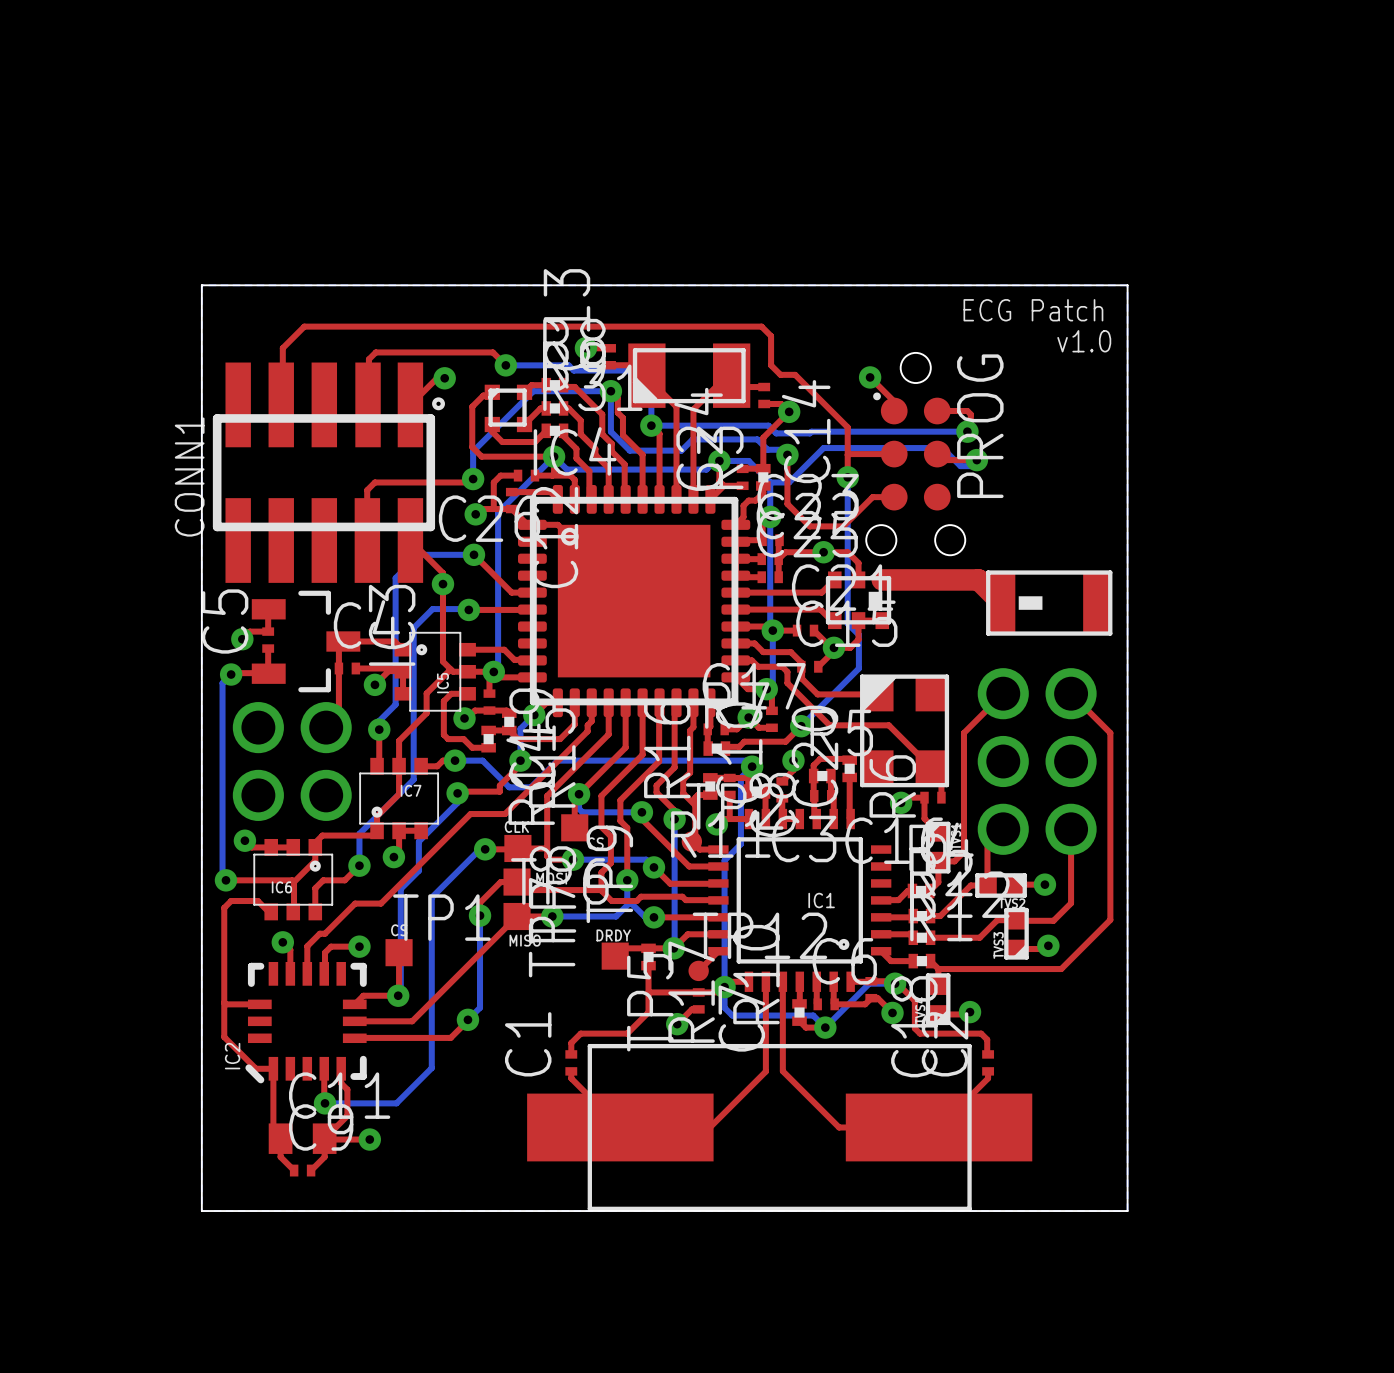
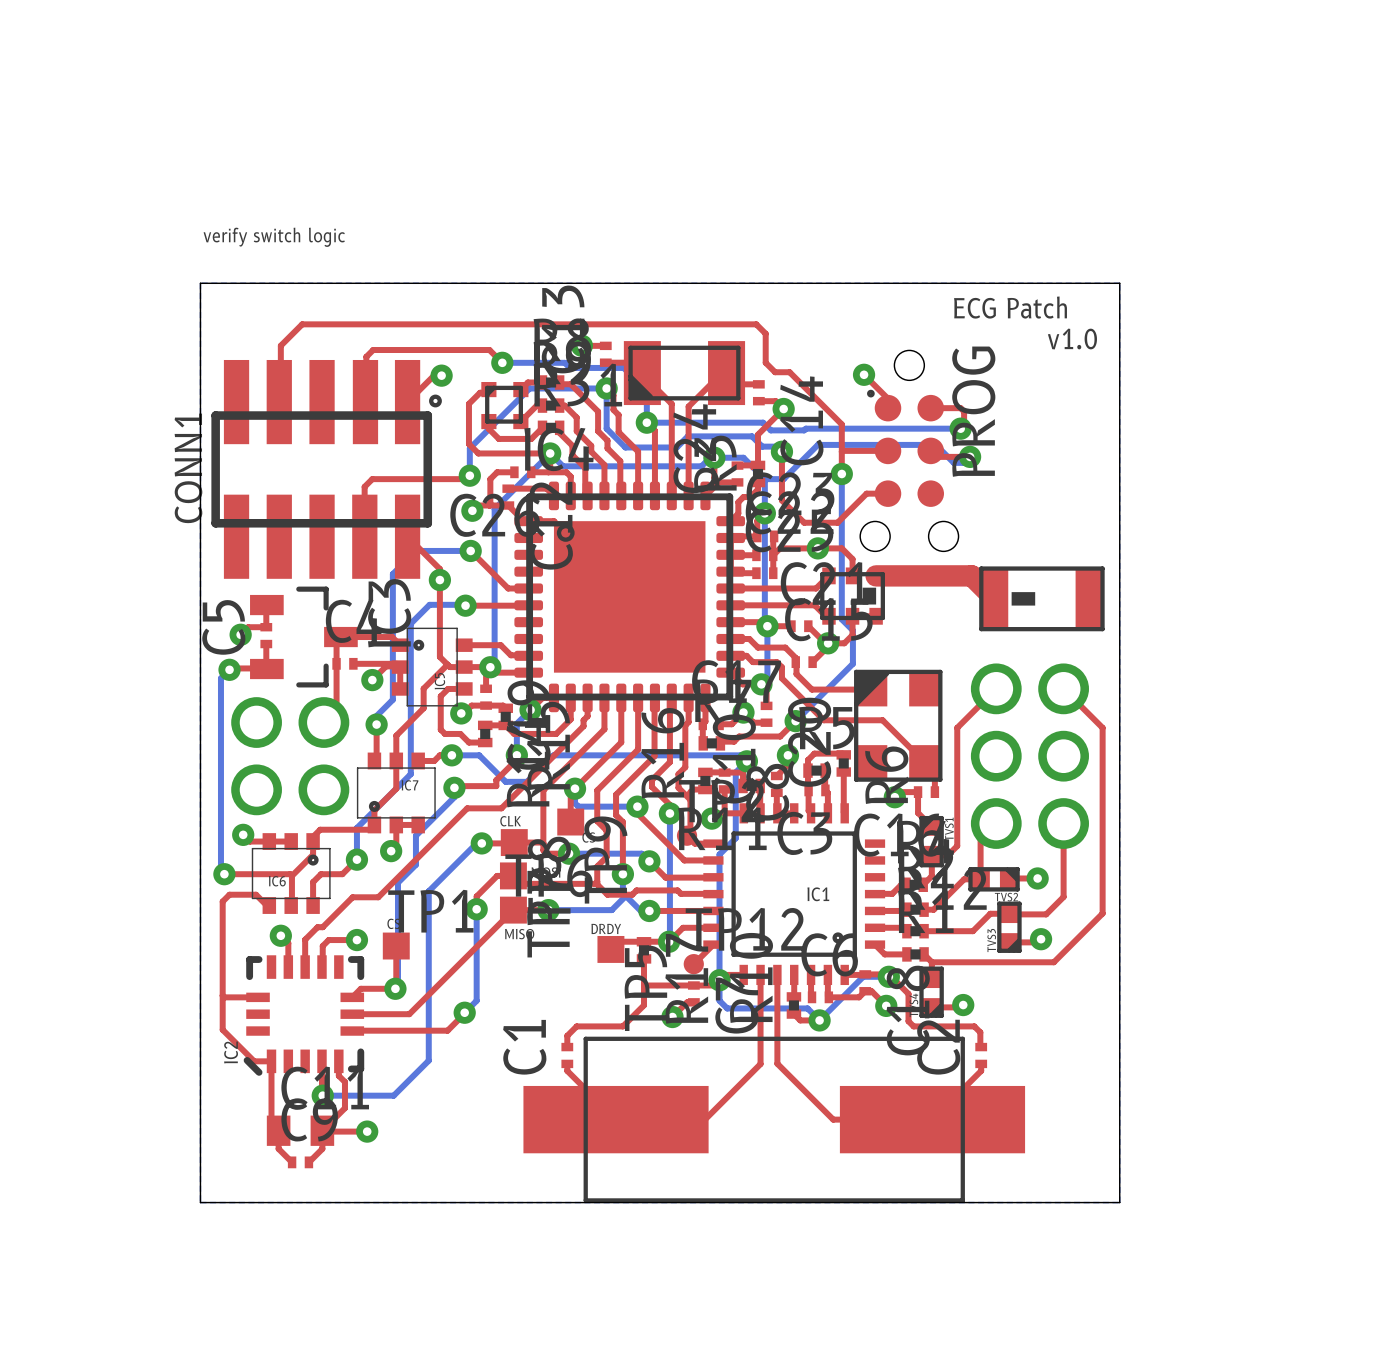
text: none -> verify switch logic (274, 237)

